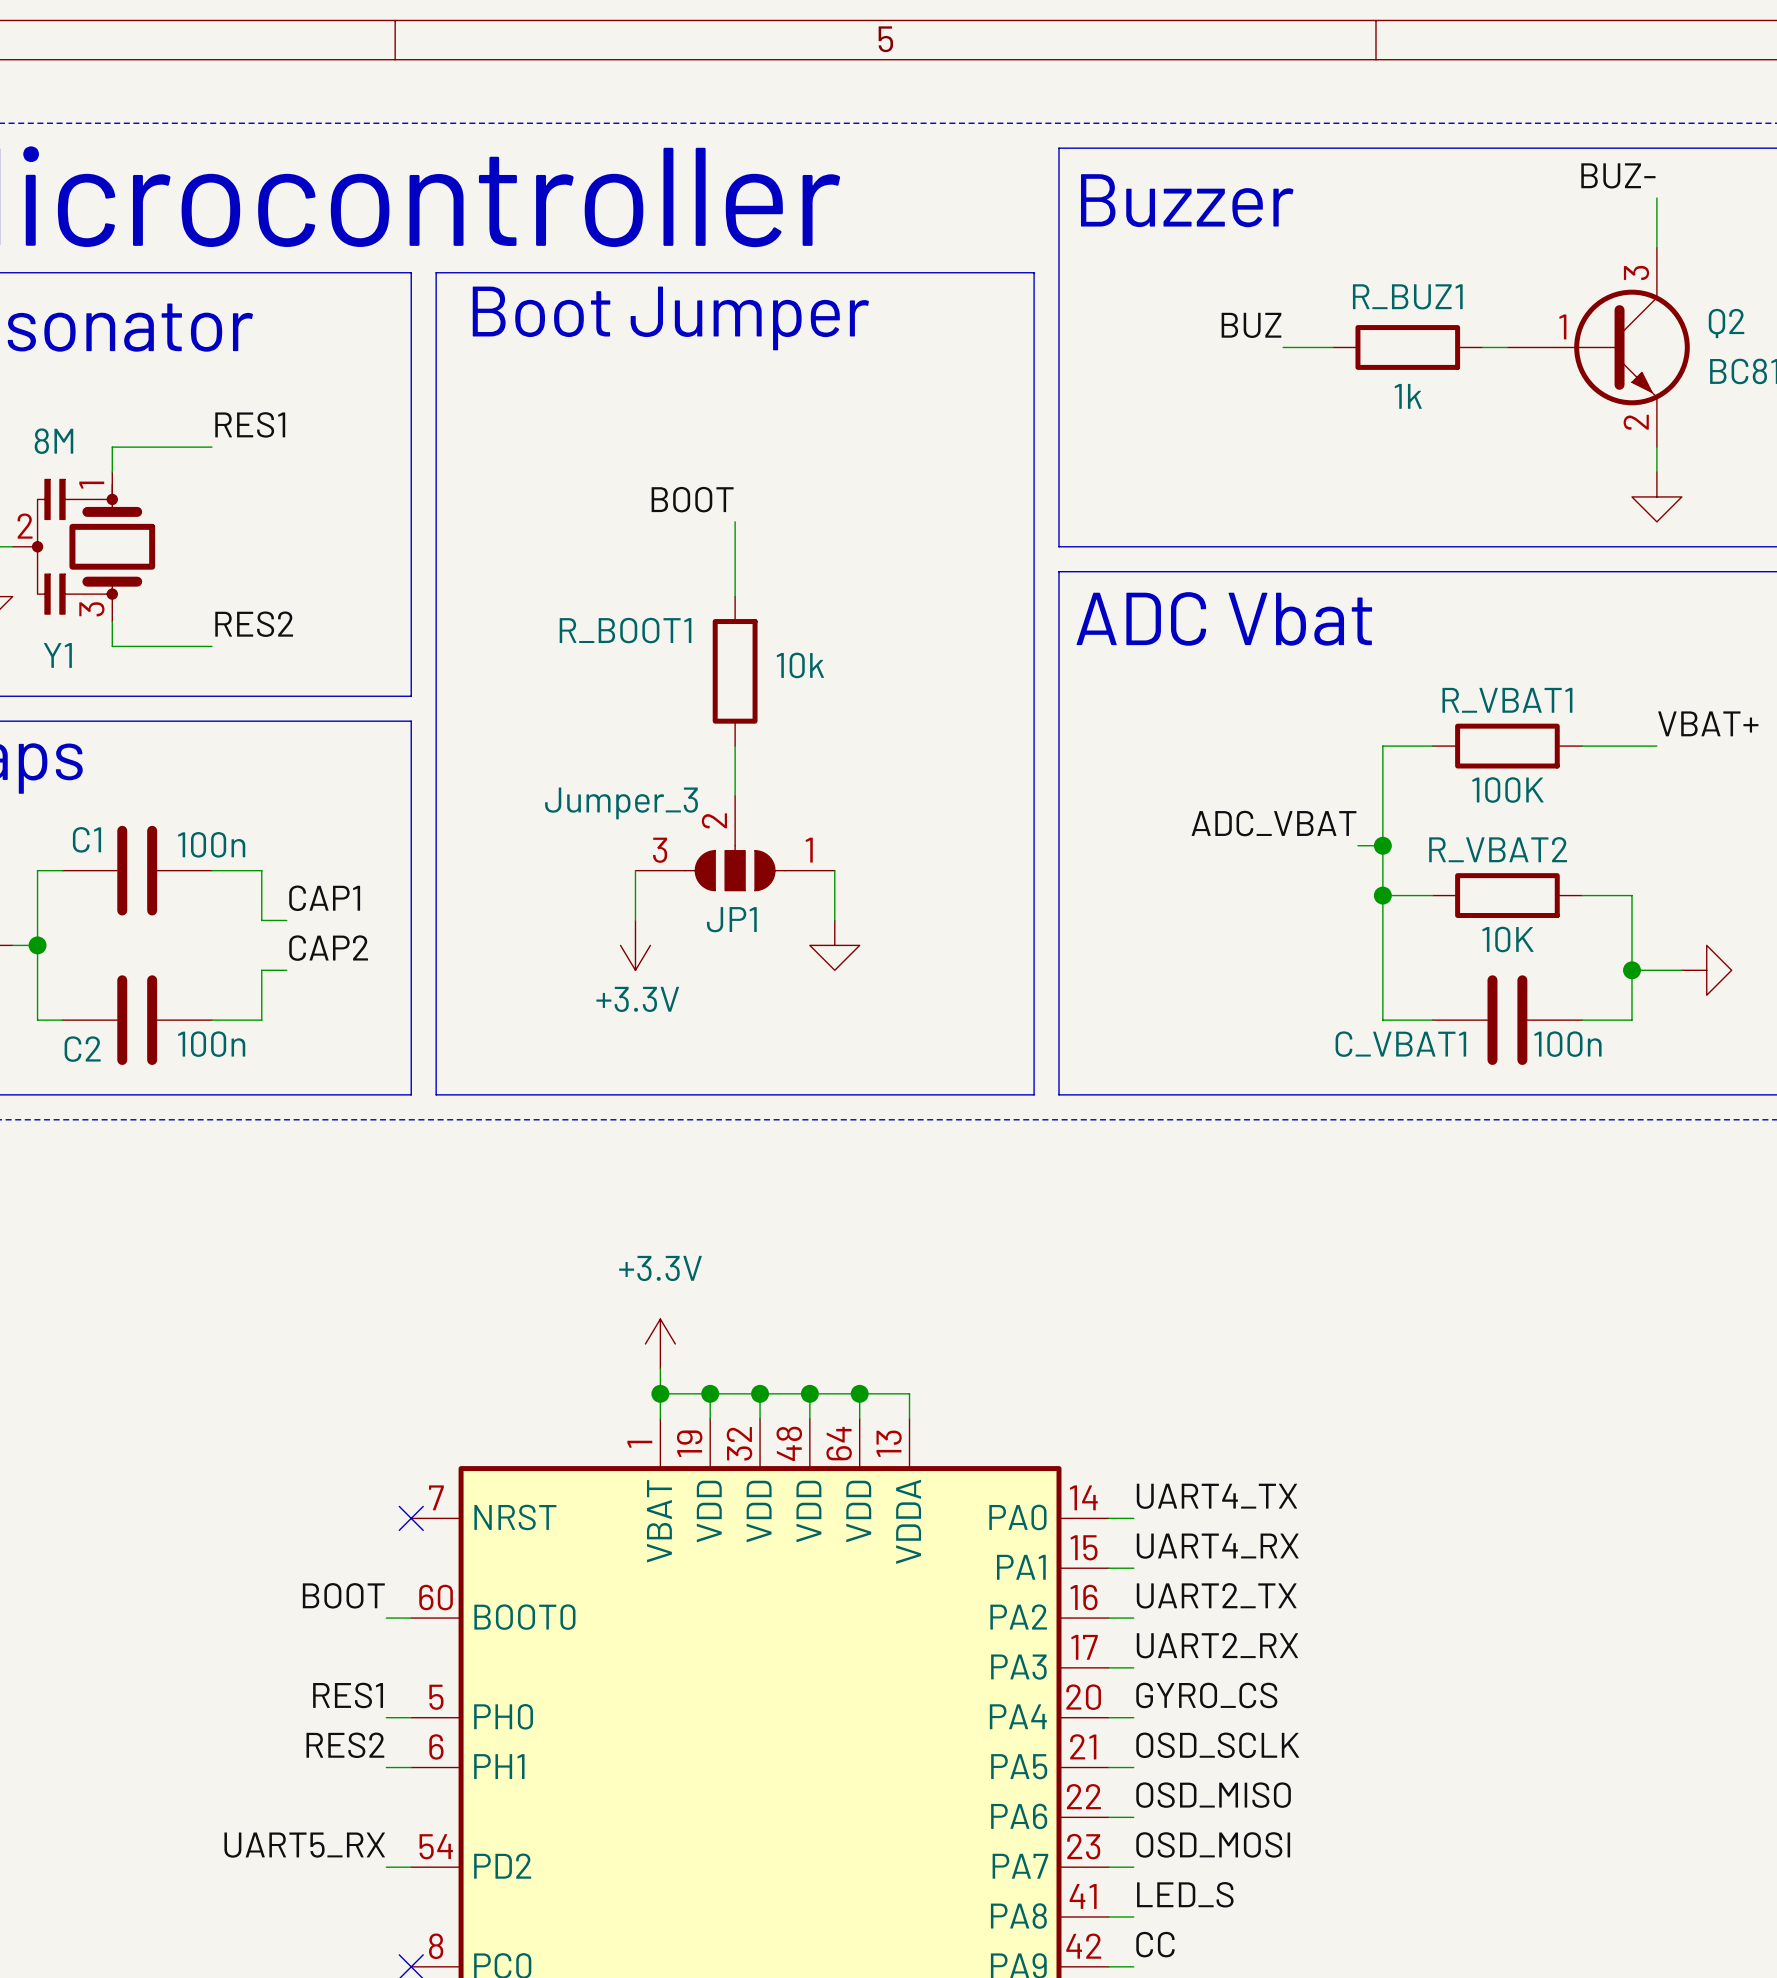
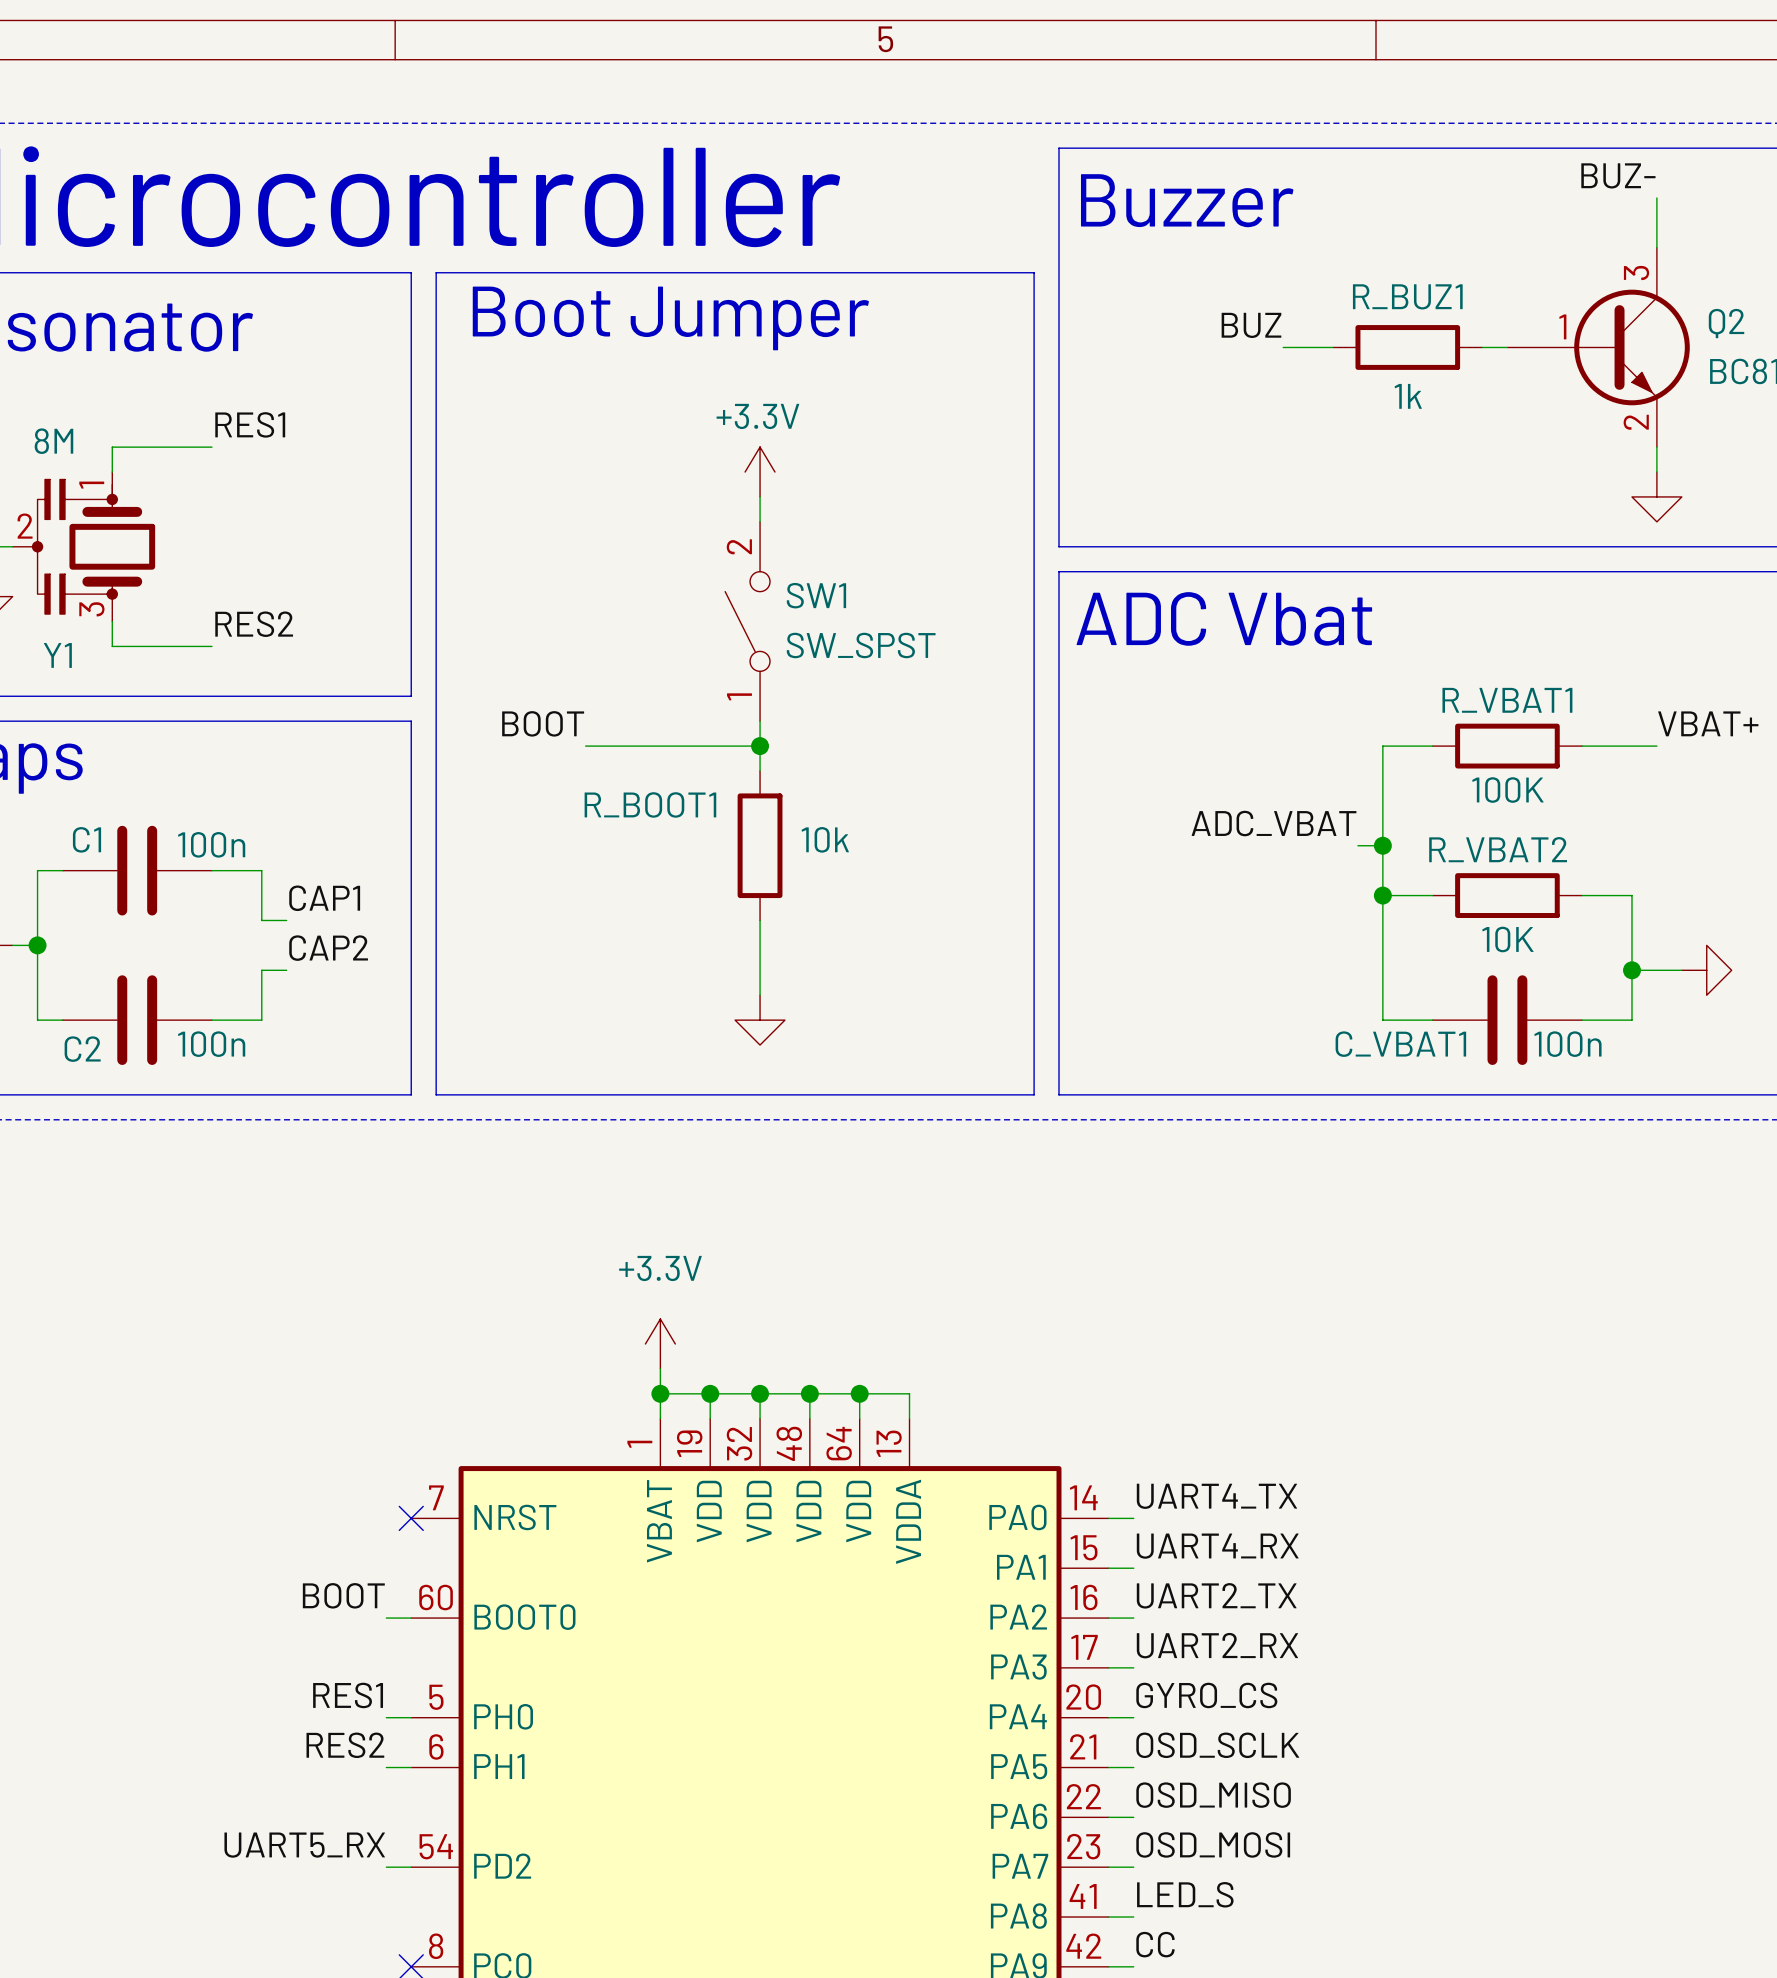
wire: none -> (760, 496) (760, 521)
label position: BOOT (692, 499) -> BOOT (543, 723)
wire: (735, 521) (735, 596) -> (760, 920) (760, 995)
SW1: none -> SW_SPST (747, 621)
R_BOOT1 position: (735, 671) -> (760, 845)
wire: none -> (585, 746) (760, 746)
wire: (735, 746) (735, 795) -> (760, 721) (760, 771)
junction: none -> (760, 746)
JP1: Jumper_3 (735, 843) -> none
wire: (635, 870) (635, 920) -> none
wire: (834, 870) (834, 920) -> none
power symbol rotation: 0° (635, 945) -> 180° (760, 472)
power symbol position: +3.3V (635, 945) -> +3.3V (760, 472)
power symbol position: (834, 945) -> (760, 1020)

